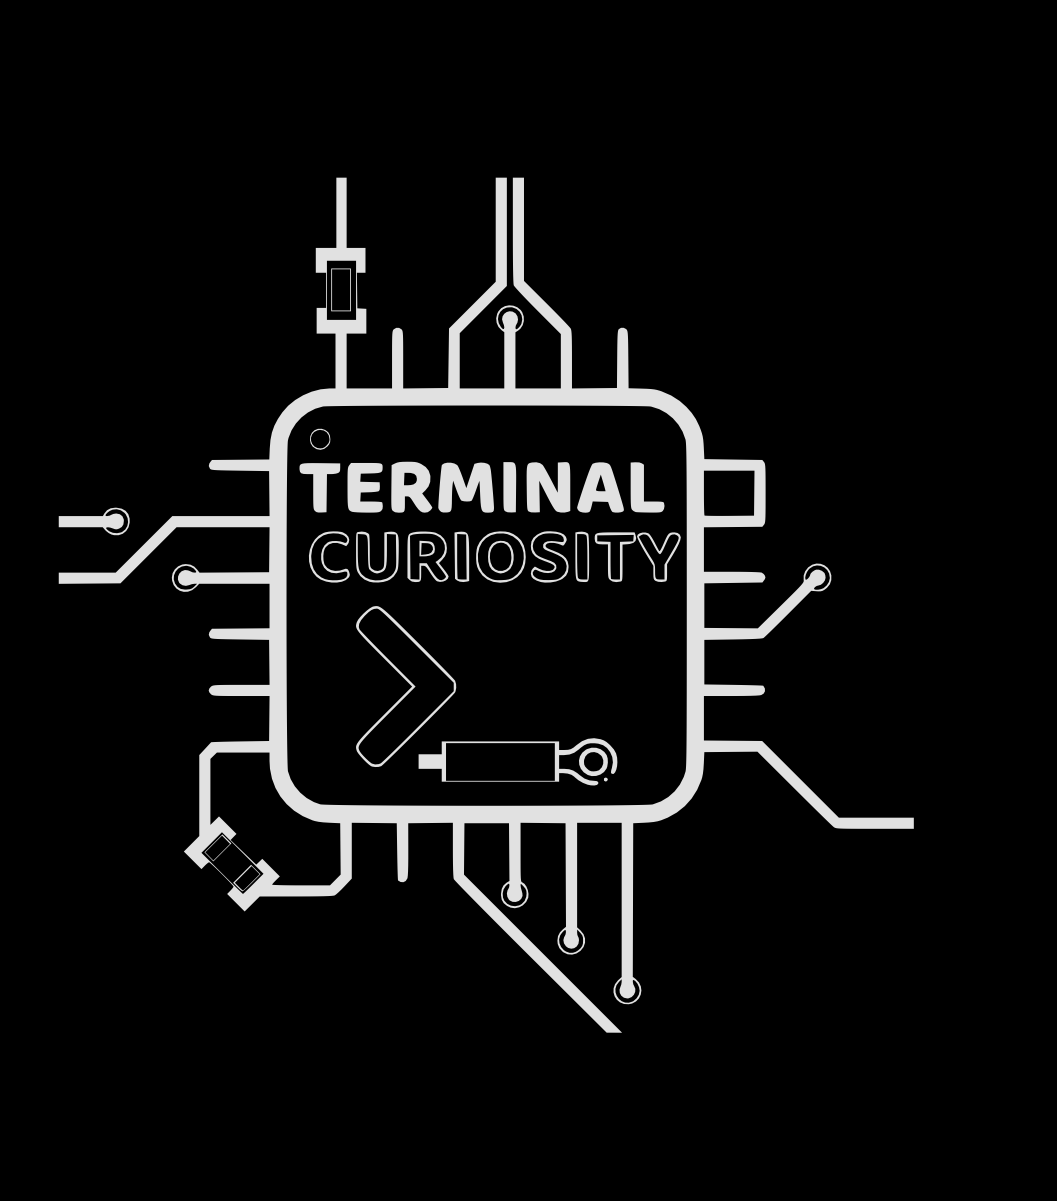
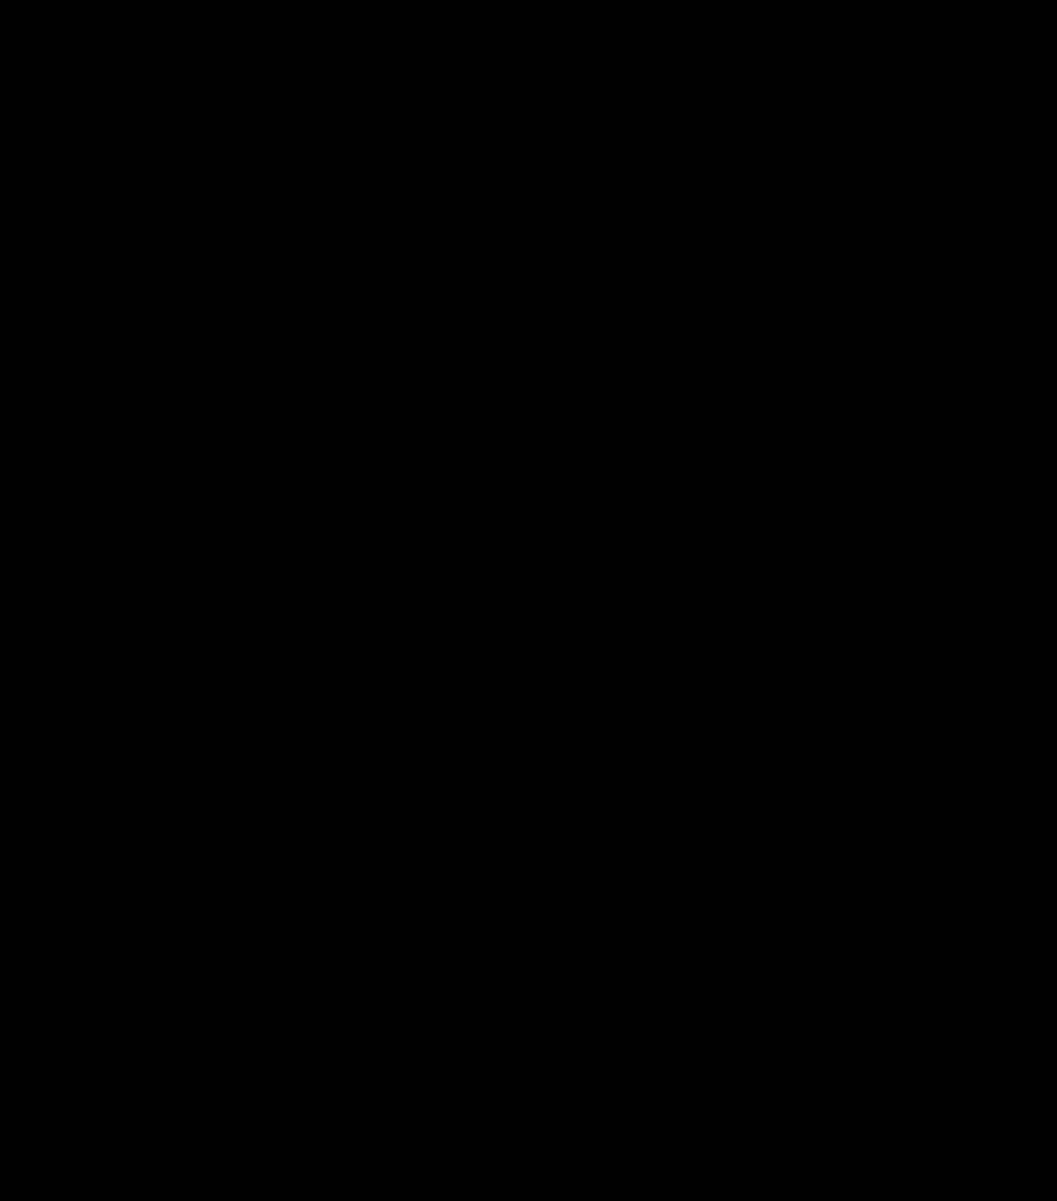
drawing: [58, 177, 914, 1033] -> none

